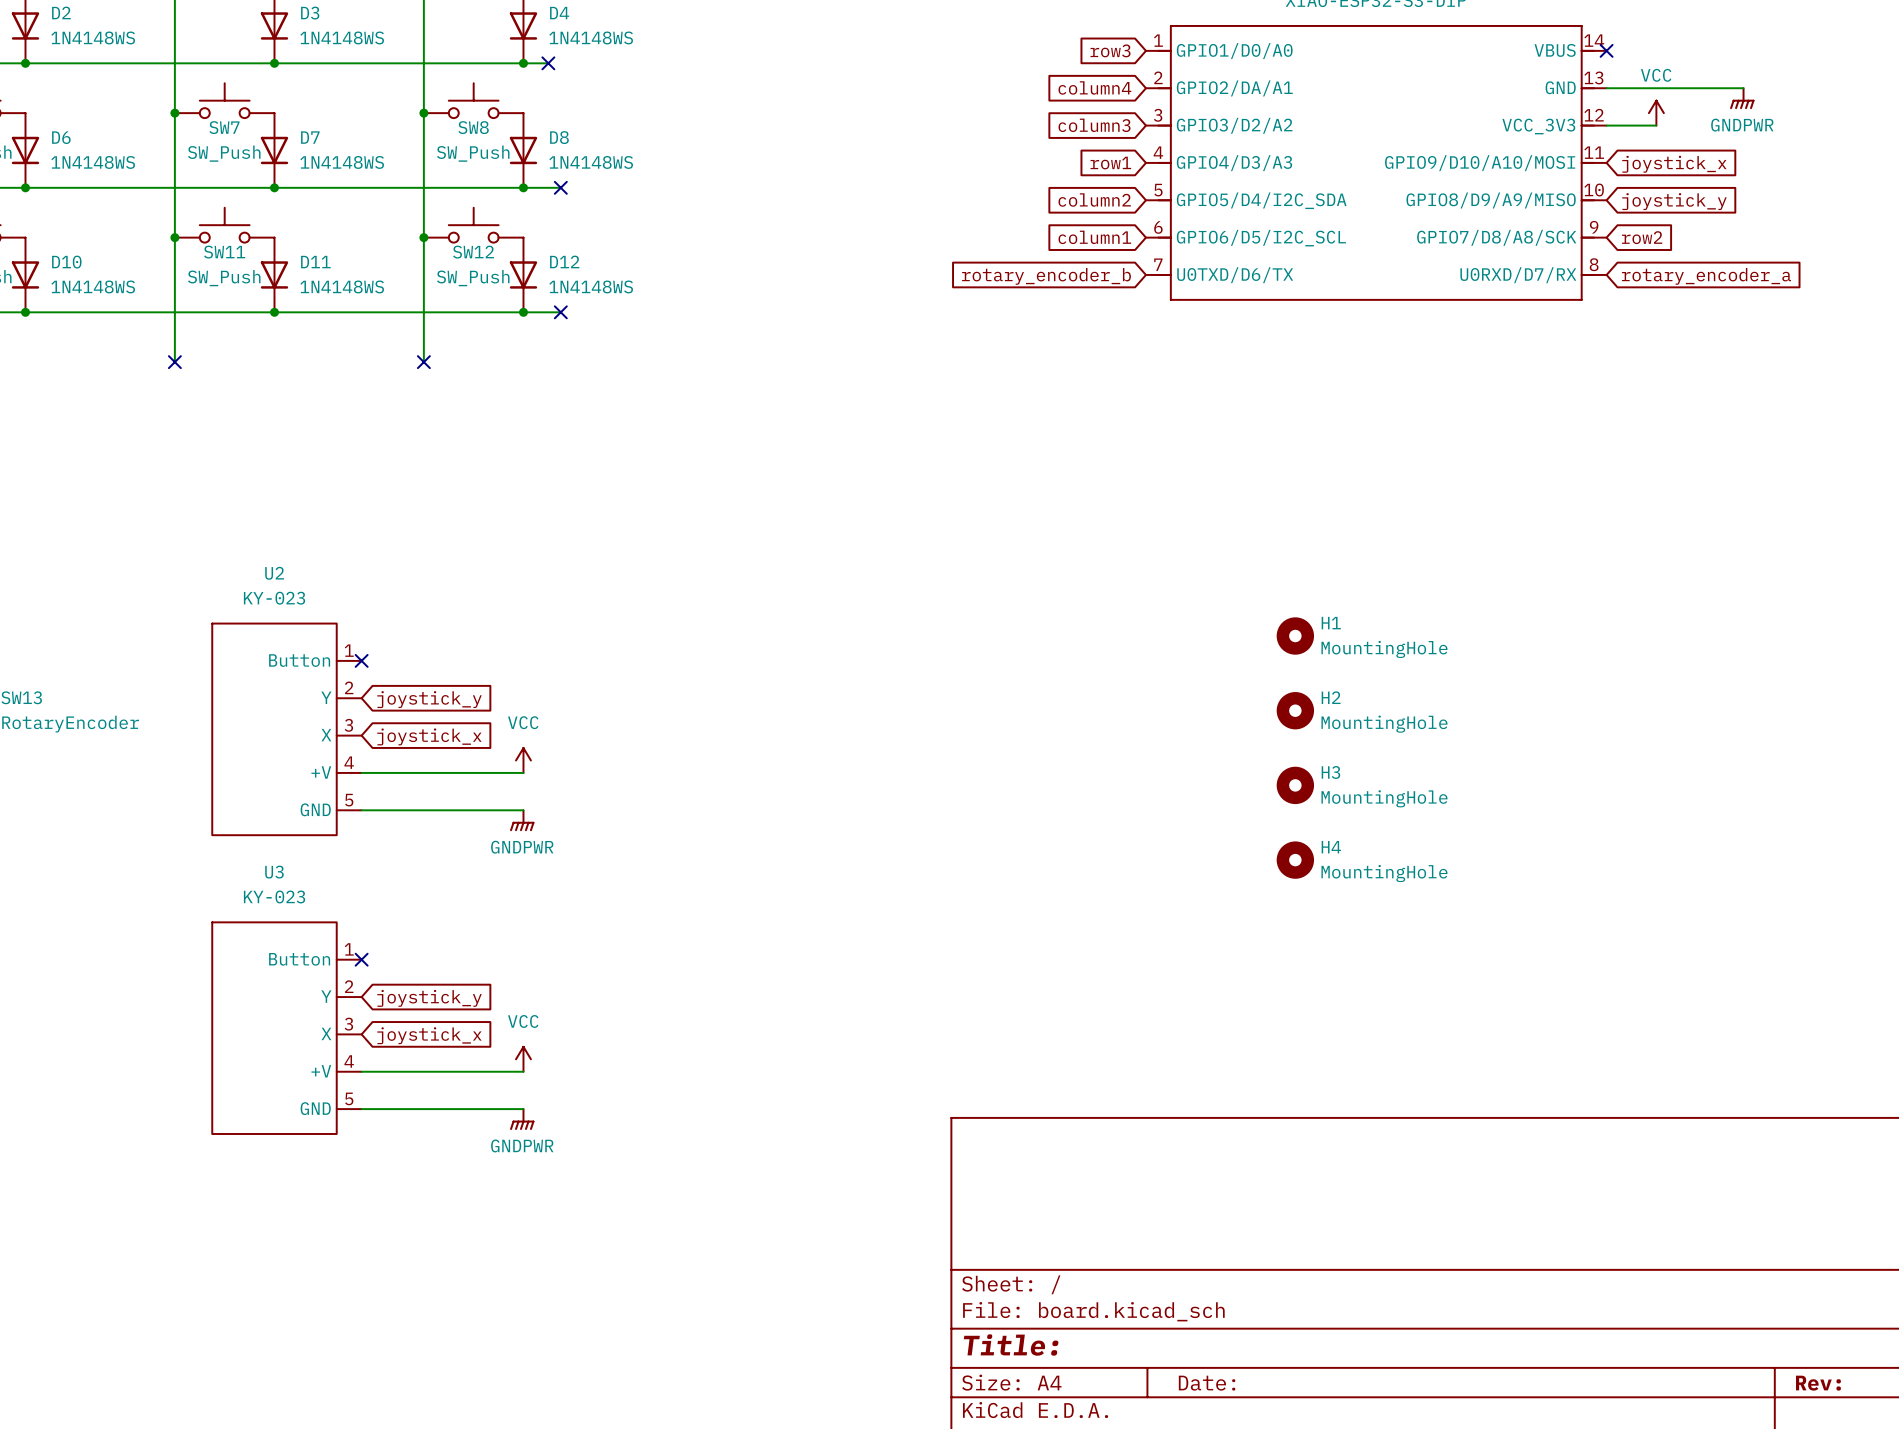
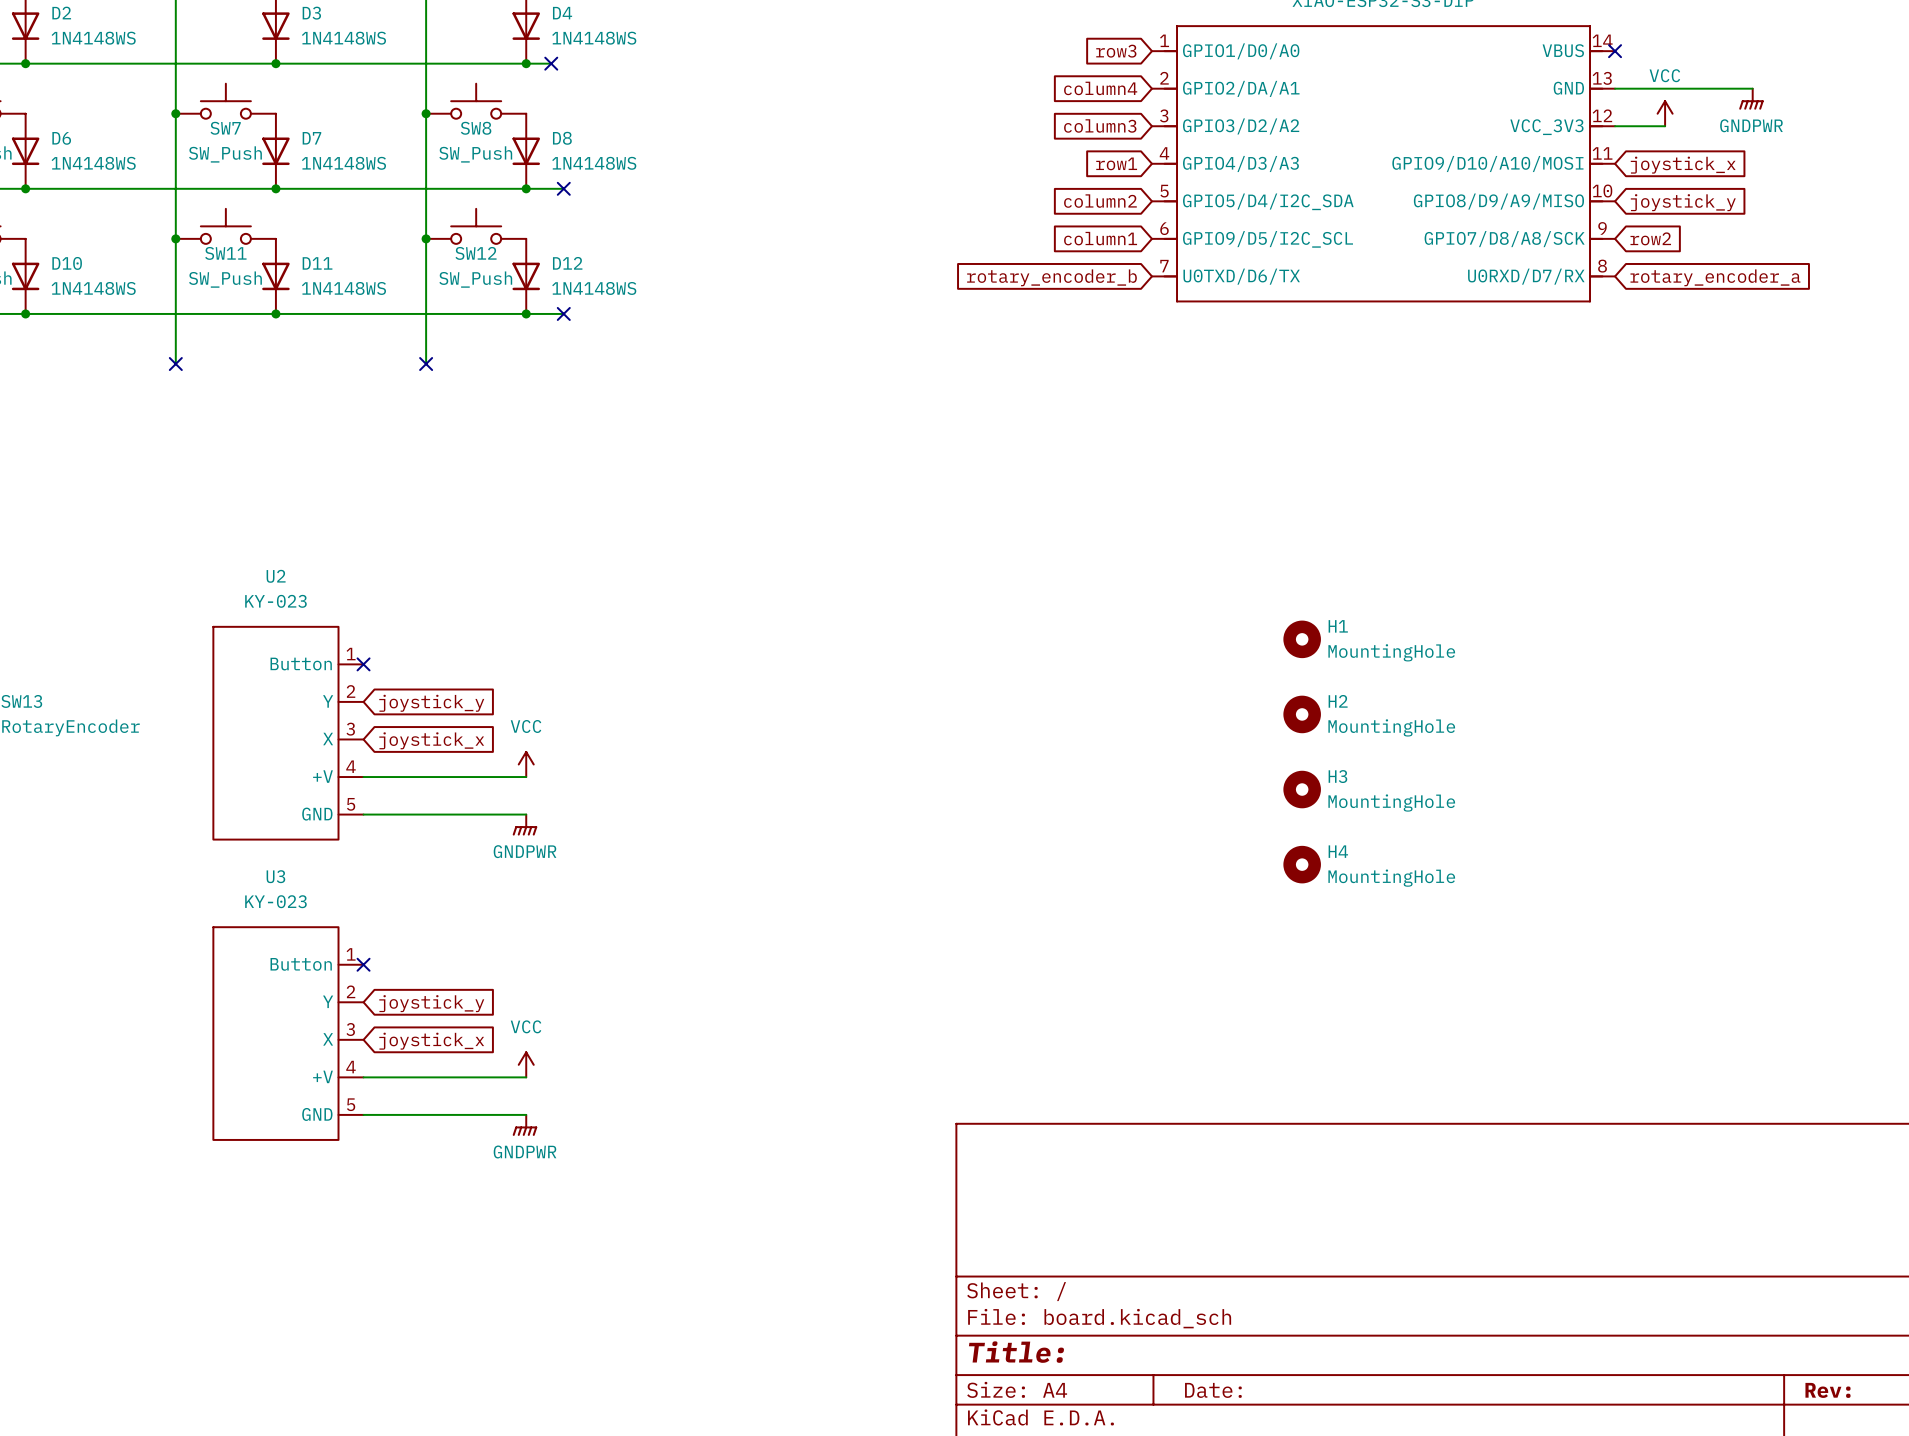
part pin name: GPIO6/D5/I2C_SCL (1261, 238) -> GPIO9/D5/I2C_SCL (1268, 239)

